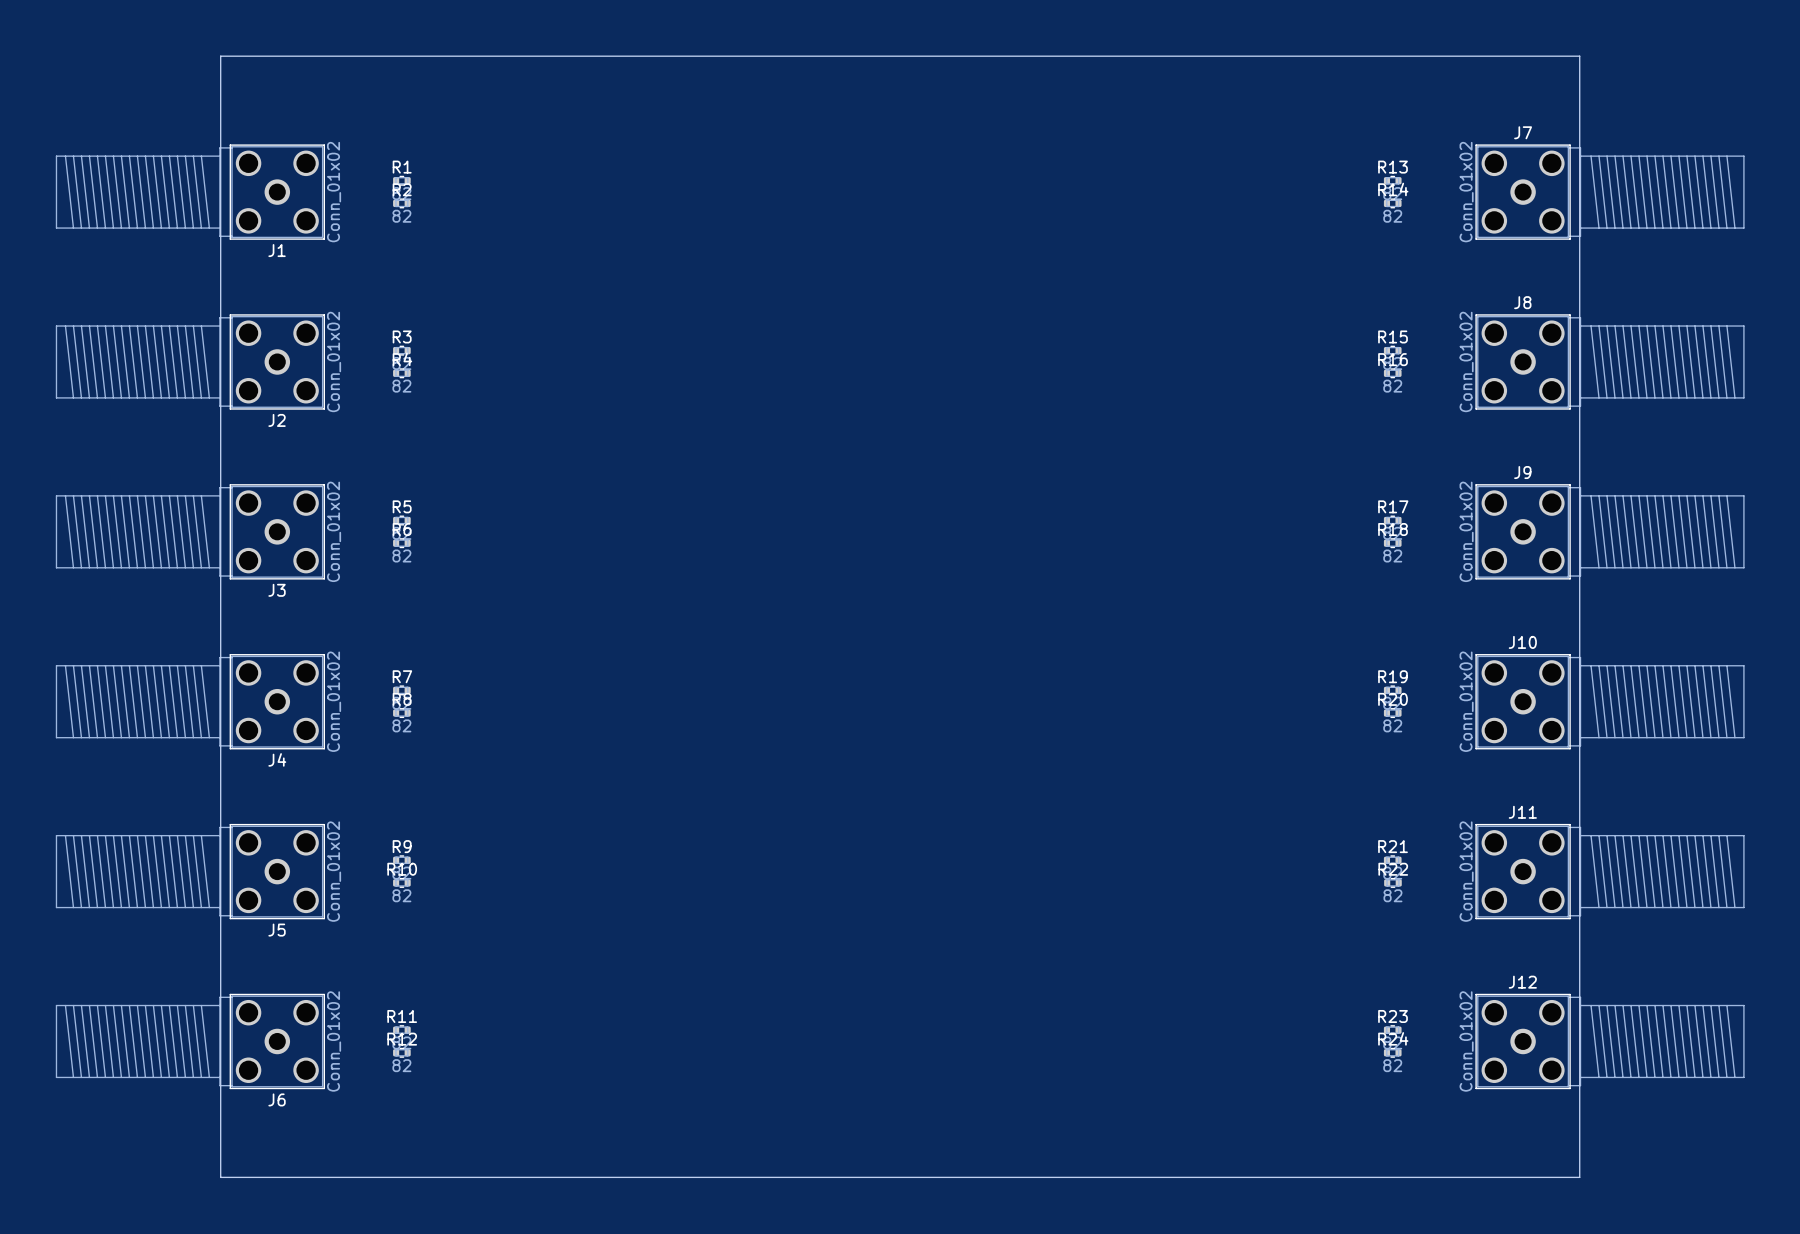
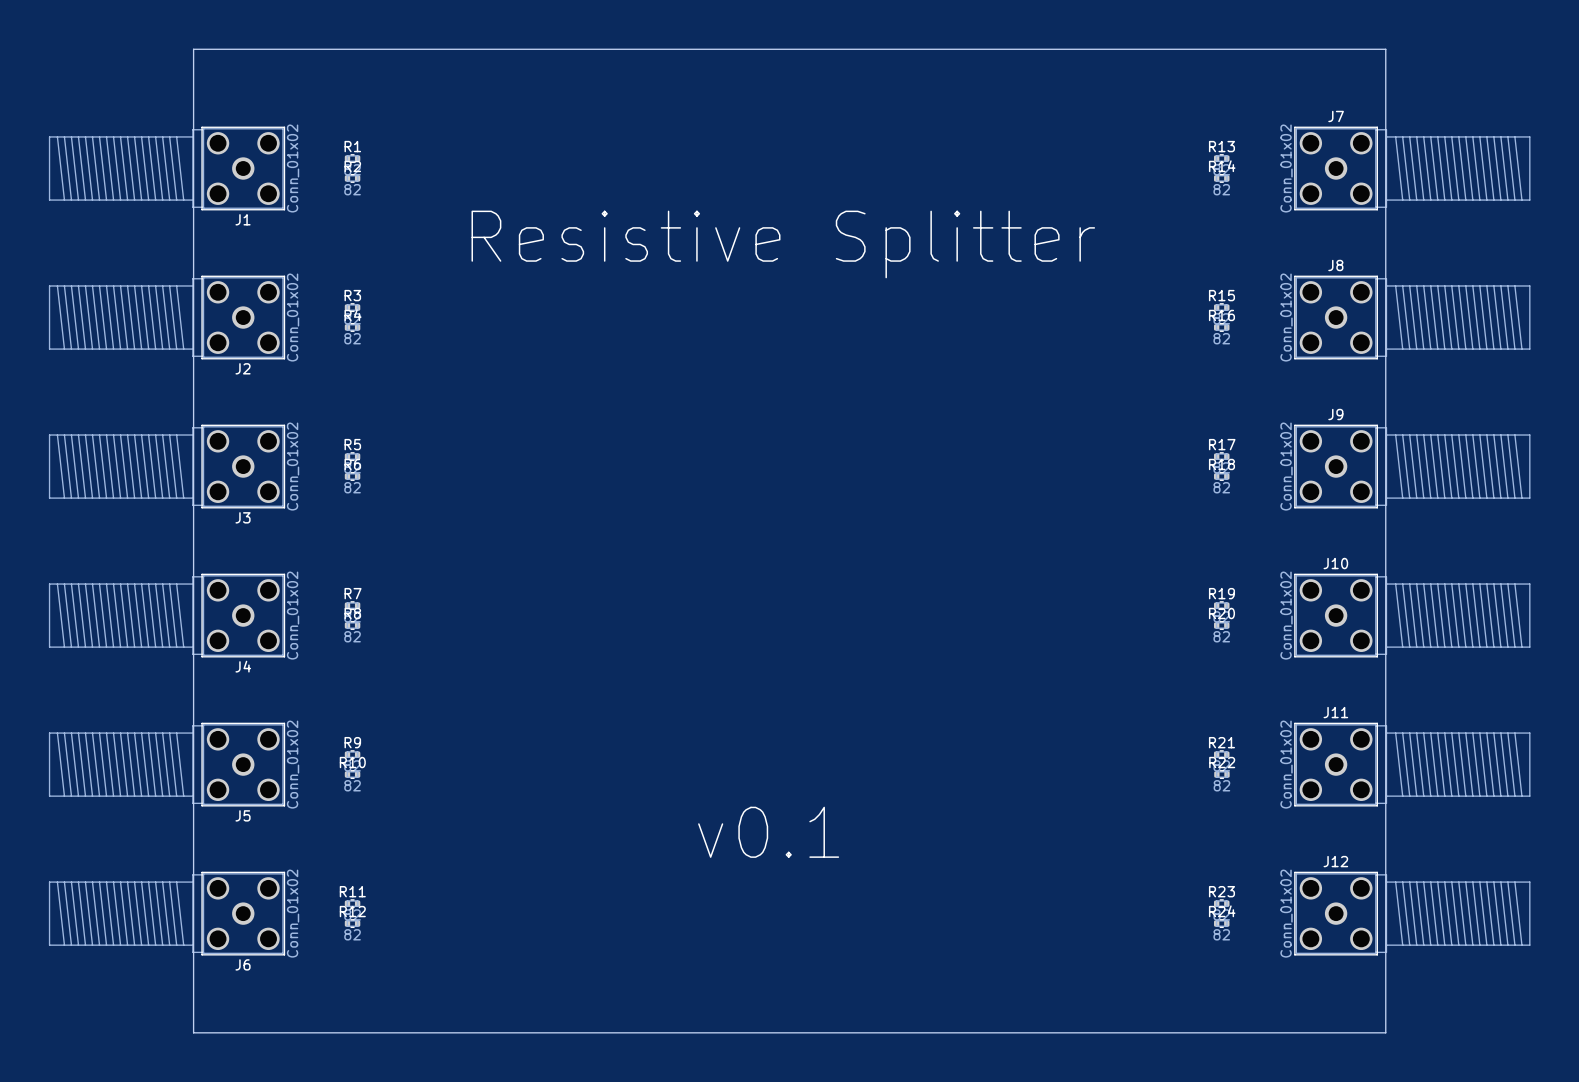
text: none -> Resistive Splitter (783, 244)
text: none -> v0.1 (768, 832)

